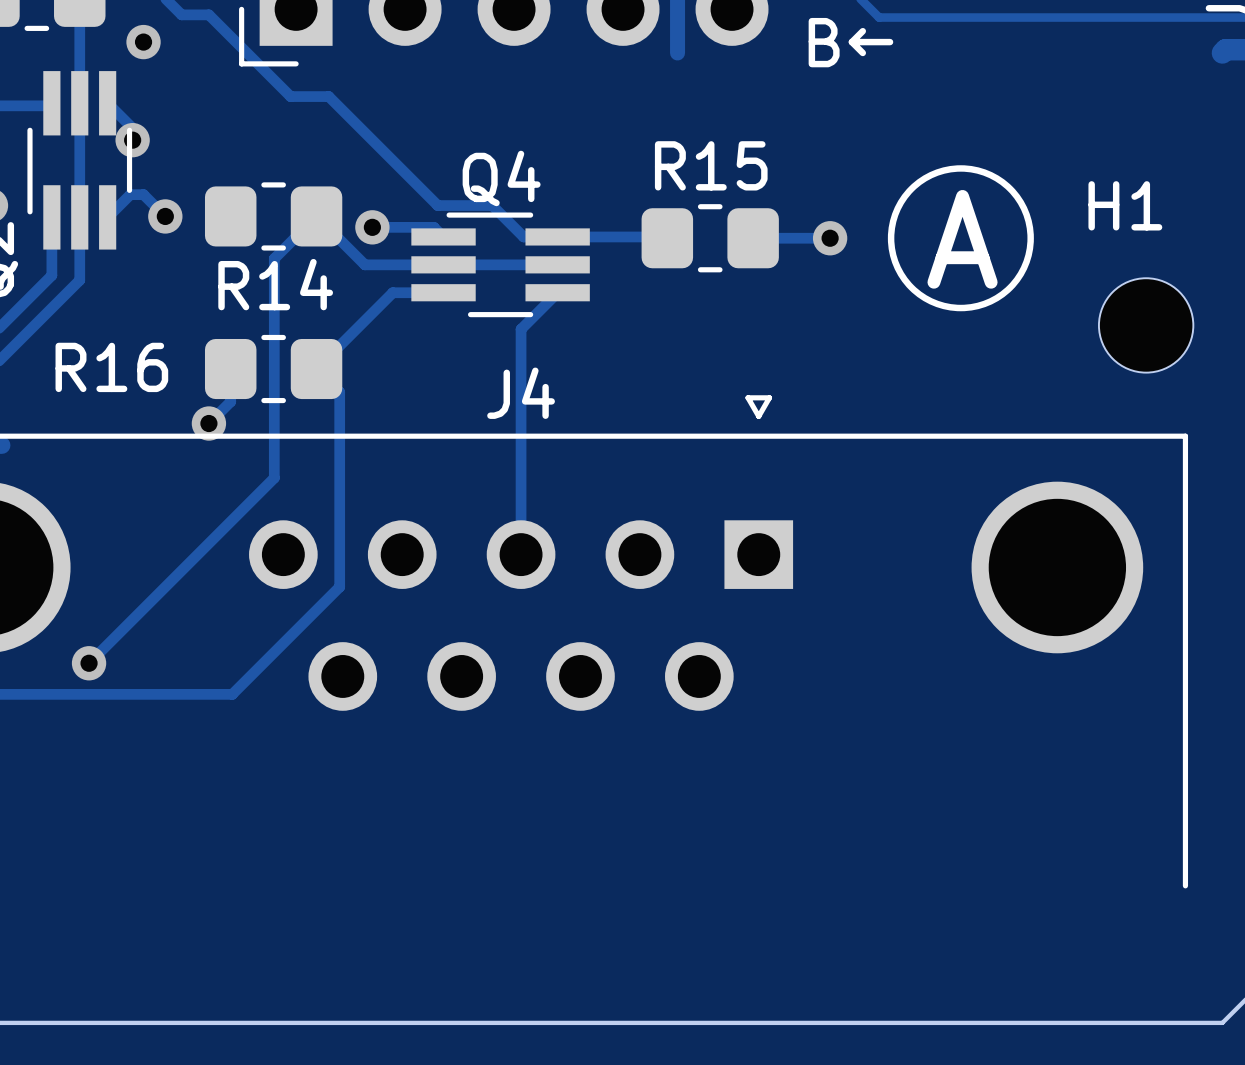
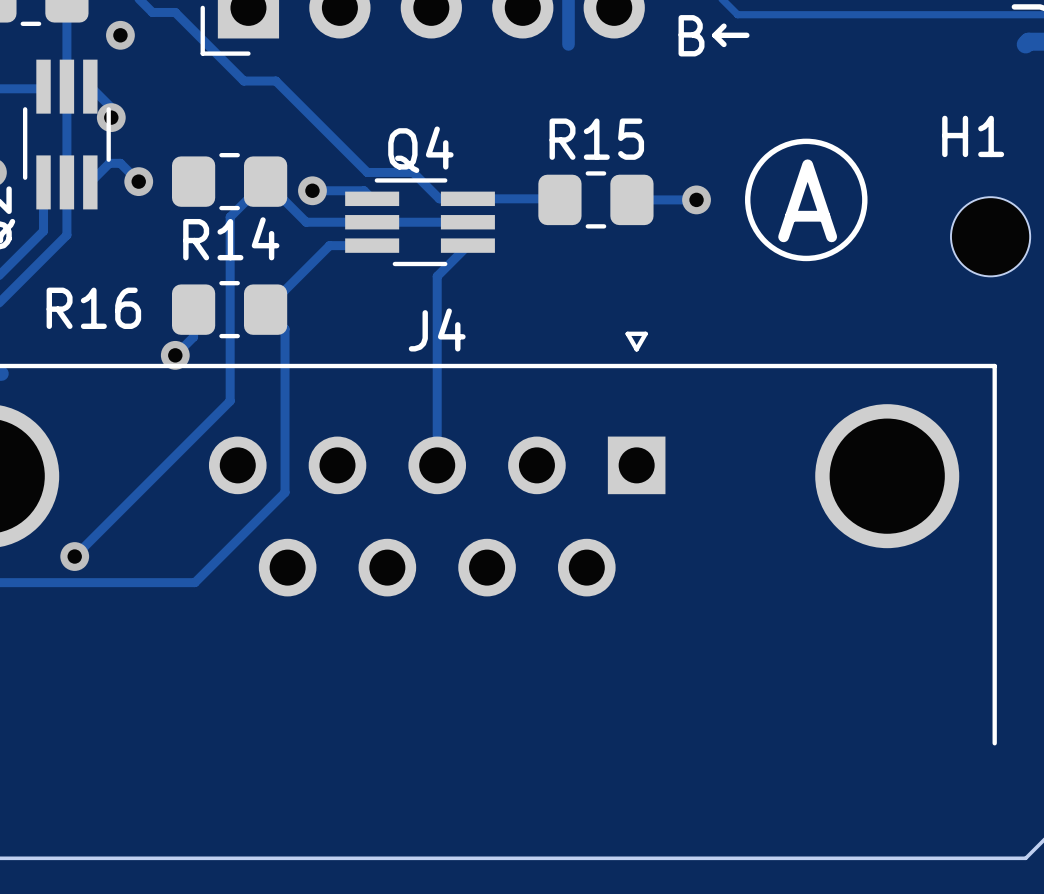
H1 position: (1146, 325) -> (990, 236)

